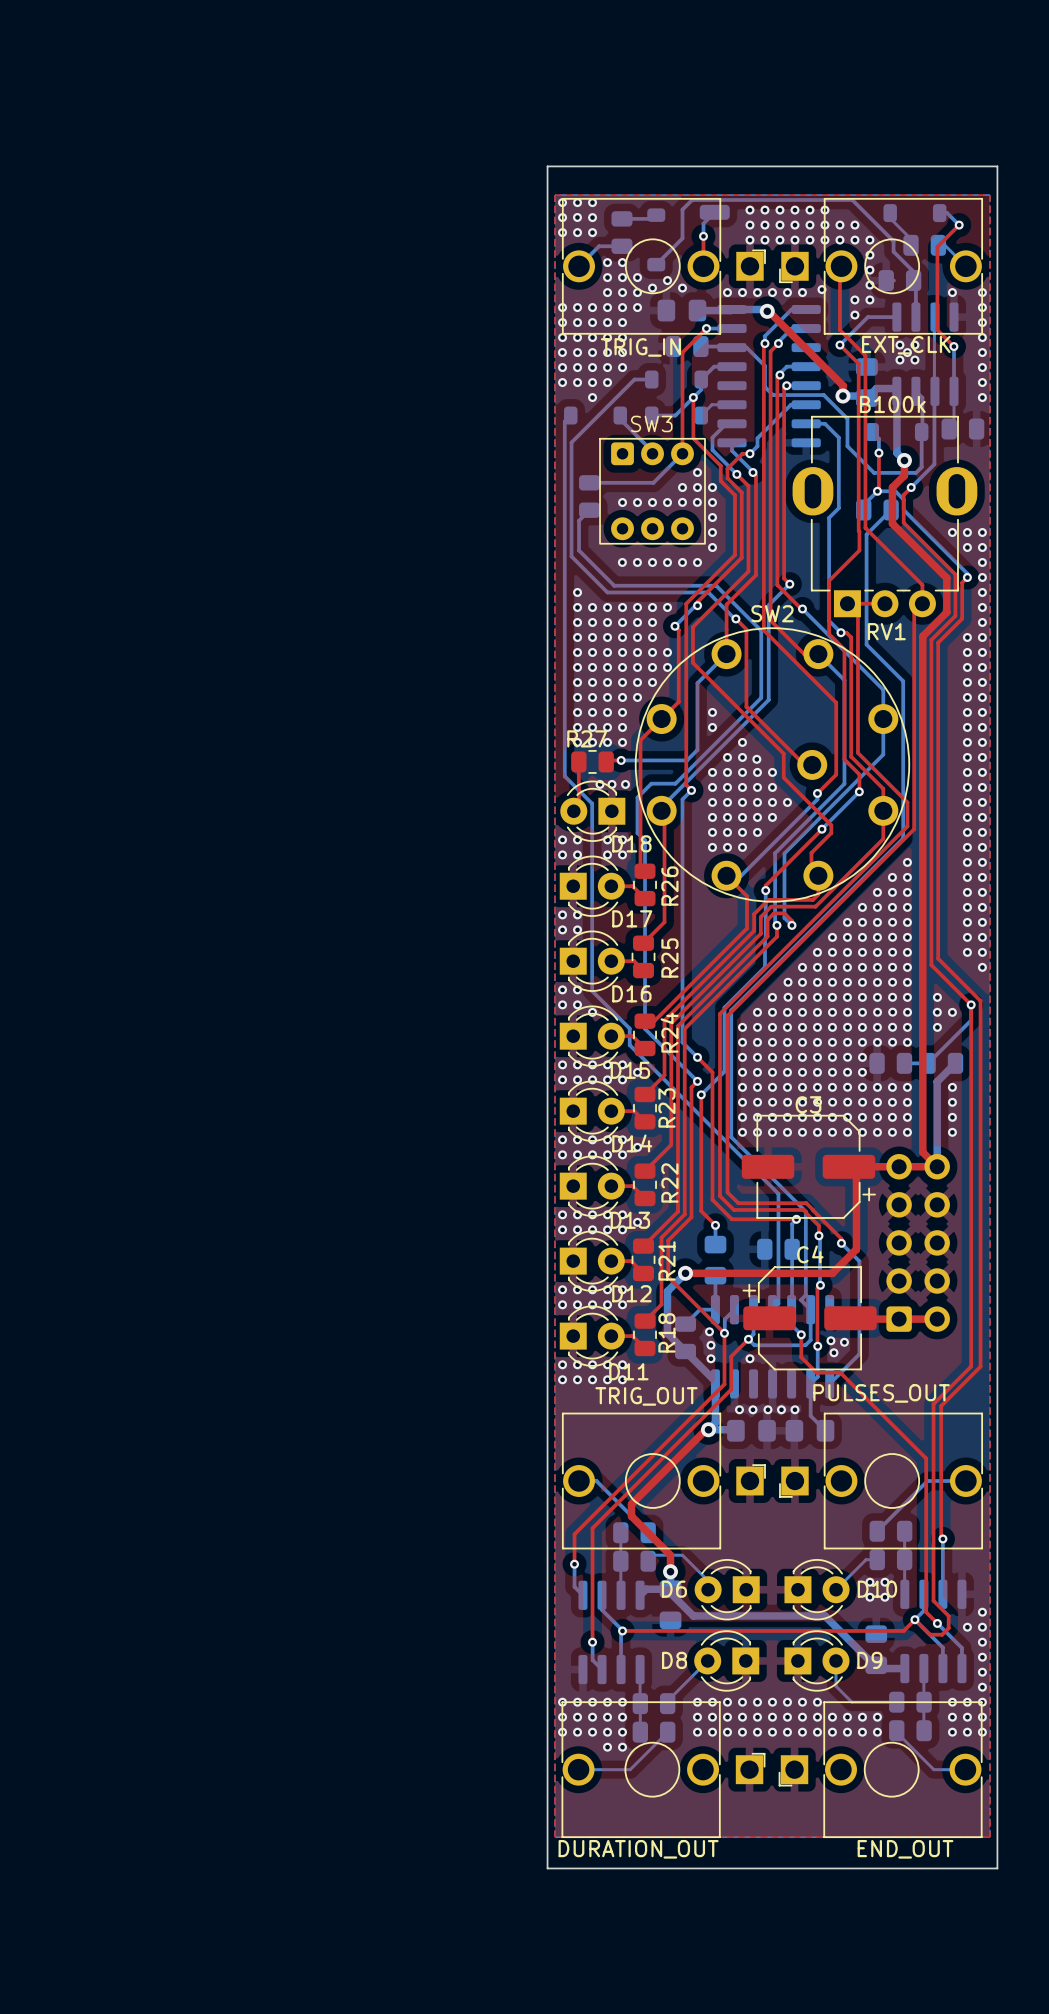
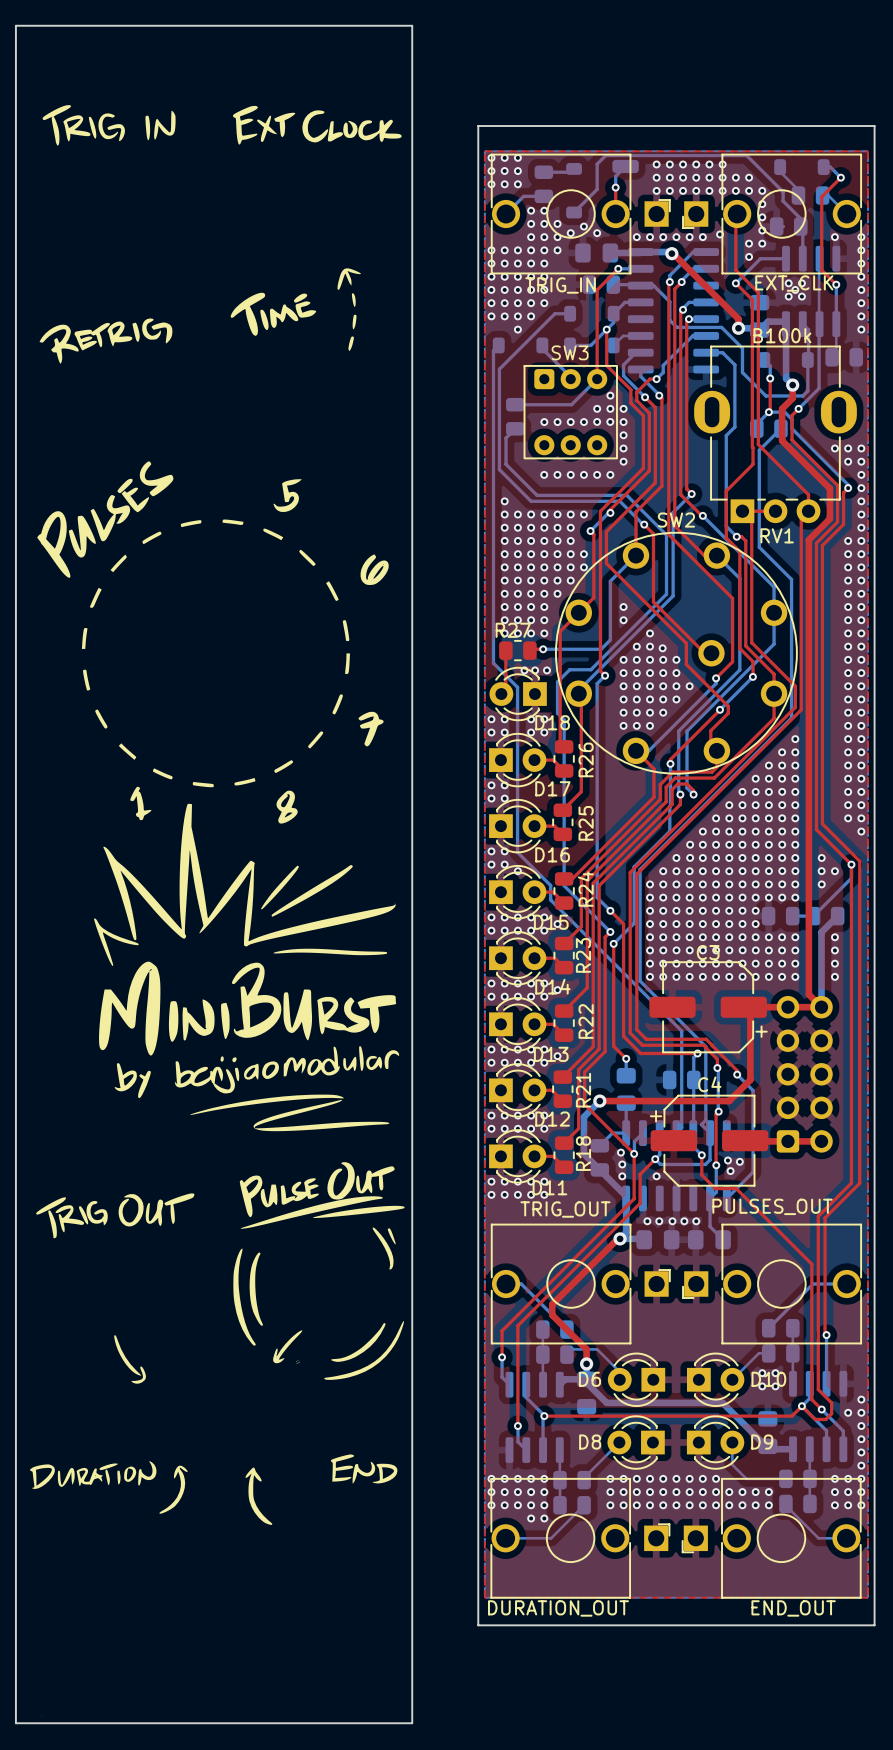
board edge: none -> (15, 25) (412, 25) (412, 1723) (15, 1723) (15, 25)
drawing: none -> [30, 105, 405, 1717]

